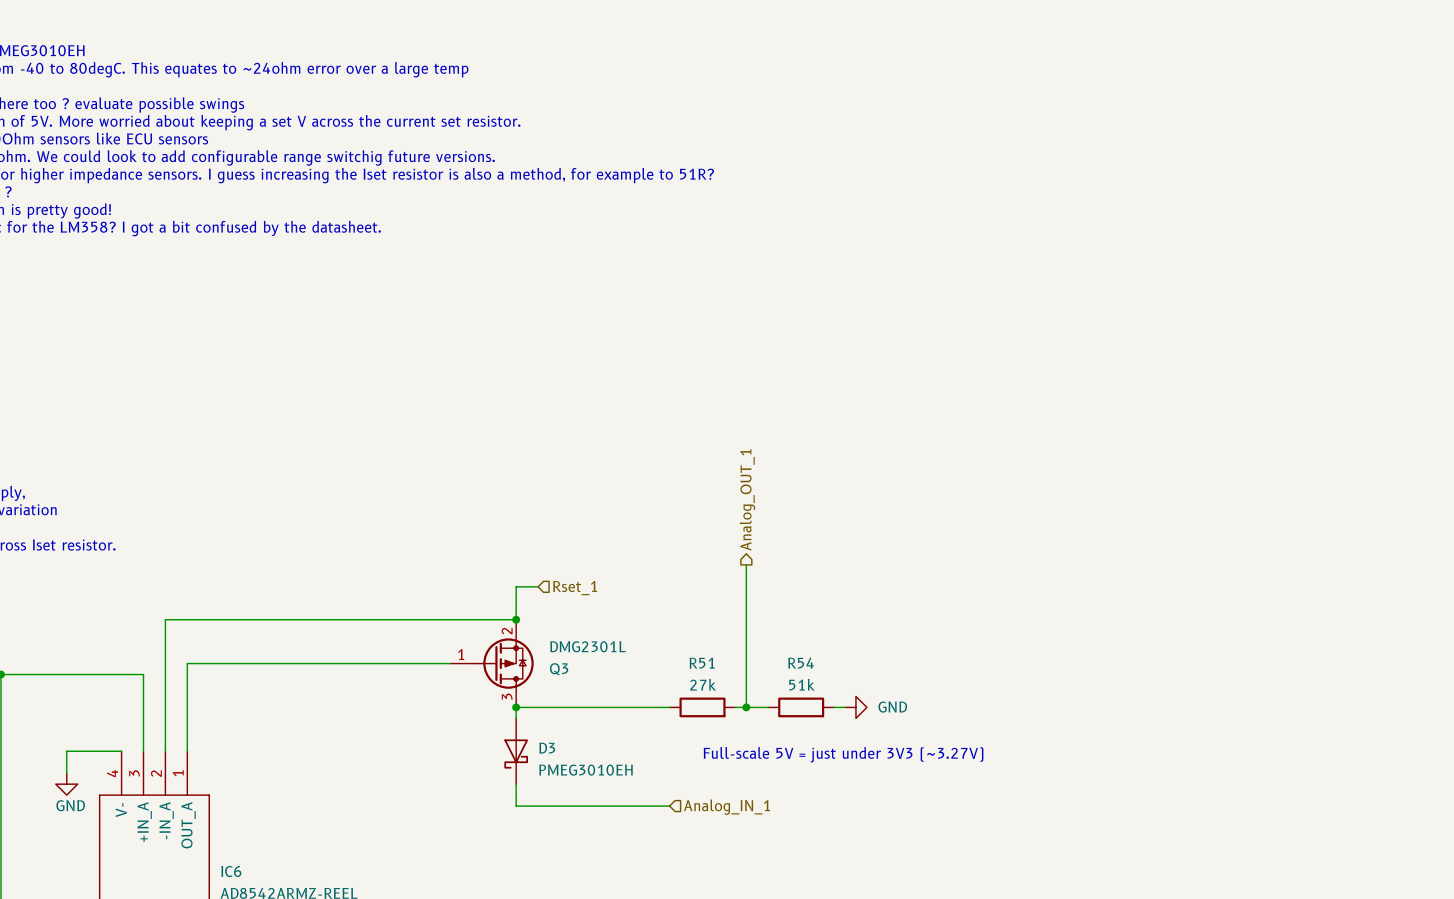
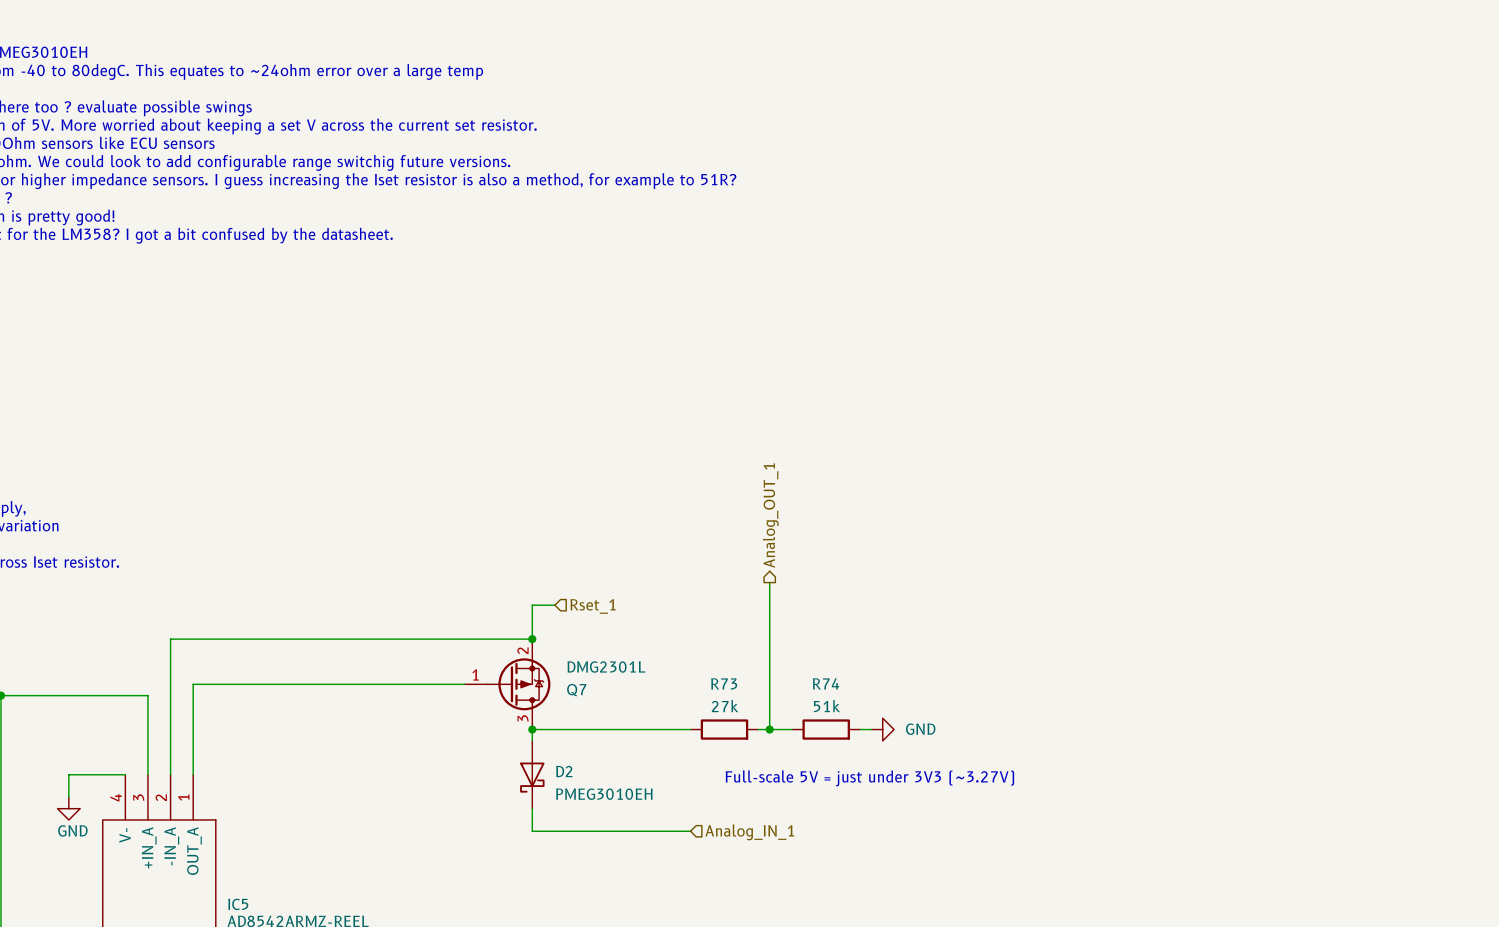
Q3: DMG2301L (492, 663) -> none
Q7: none -> DMG2301L (507, 684)
R51 name: R51 (702, 663) -> R73 (724, 683)
R54 name: R54 (801, 663) -> R74 (826, 683)
D3 name: D3 (547, 748) -> D2 (564, 771)
IC6 name: IC6 (231, 871) -> IC5 (238, 904)

